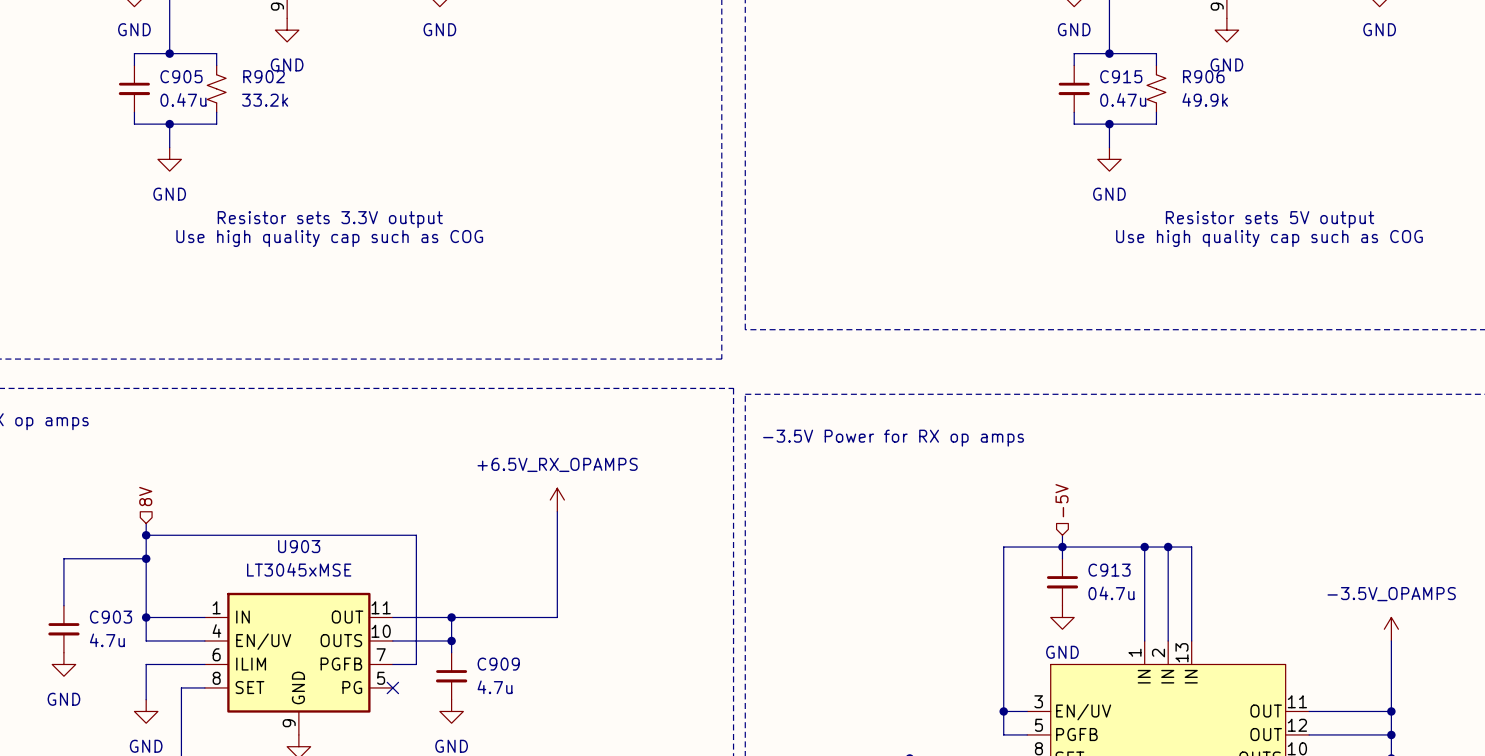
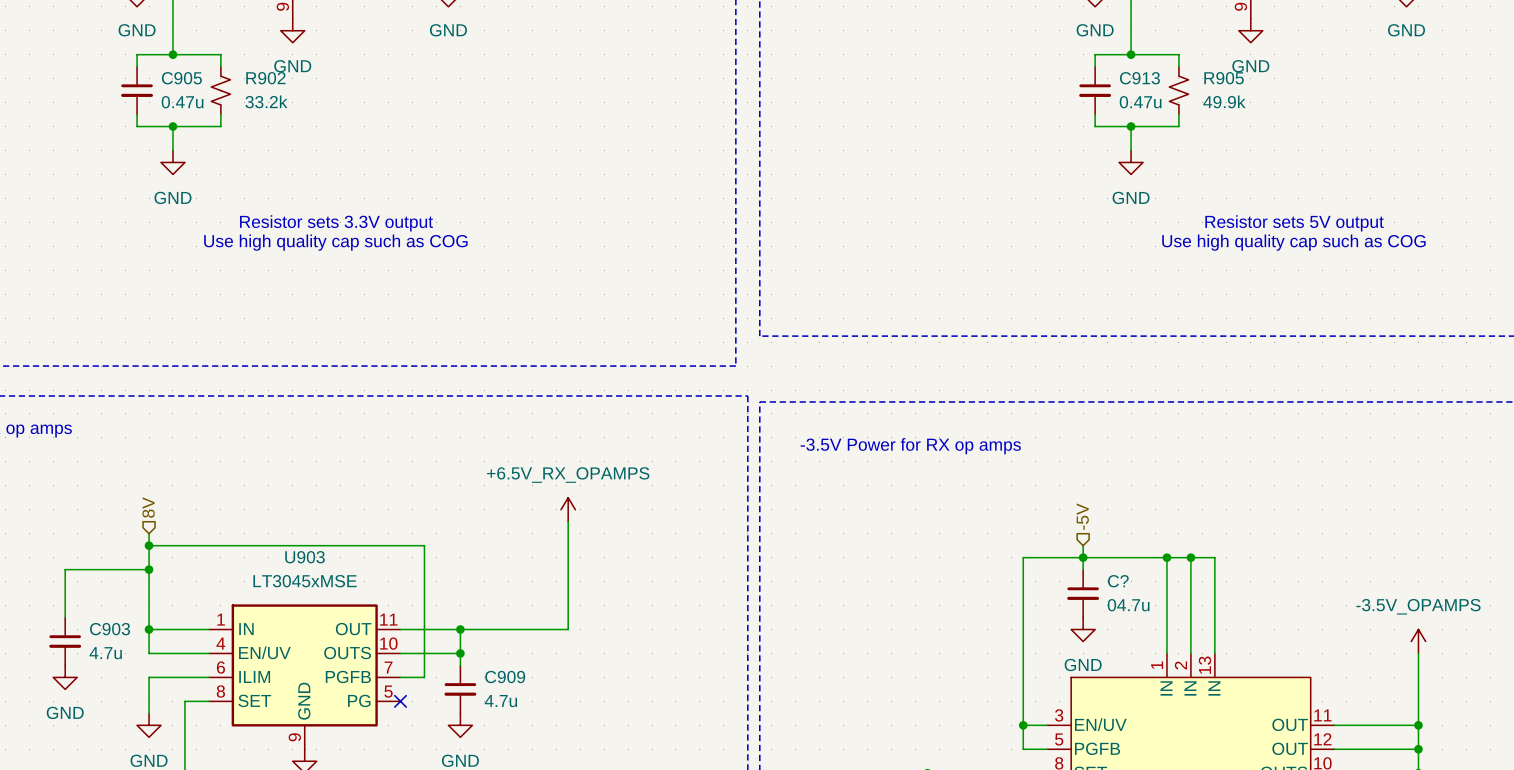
C915 name: C915 (1121, 76) -> C913 (1139, 78)
R906 name: R906 (1203, 76) -> R905 (1224, 78)
C913 name: C913 (1109, 570) -> C? (1118, 581)

